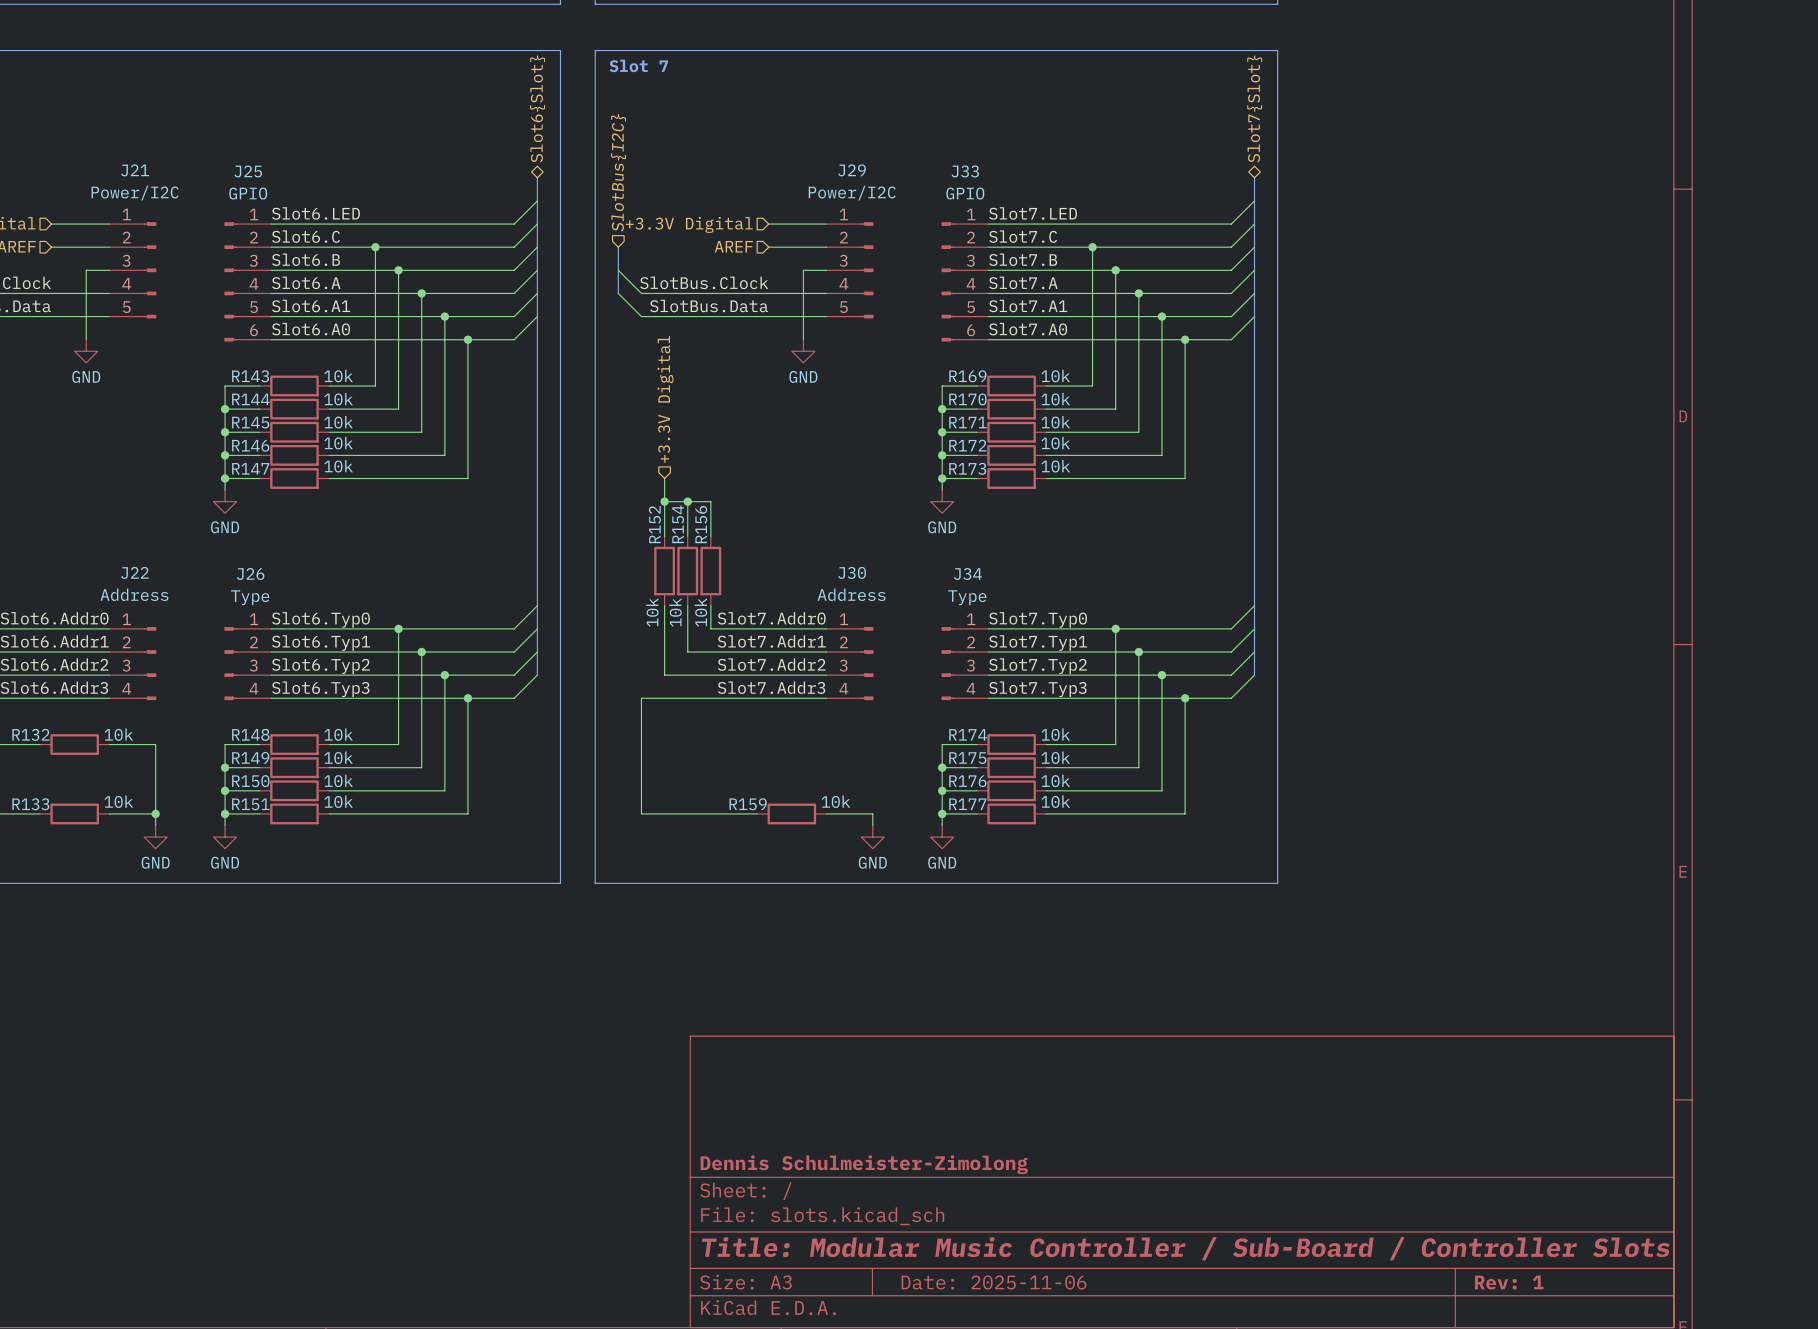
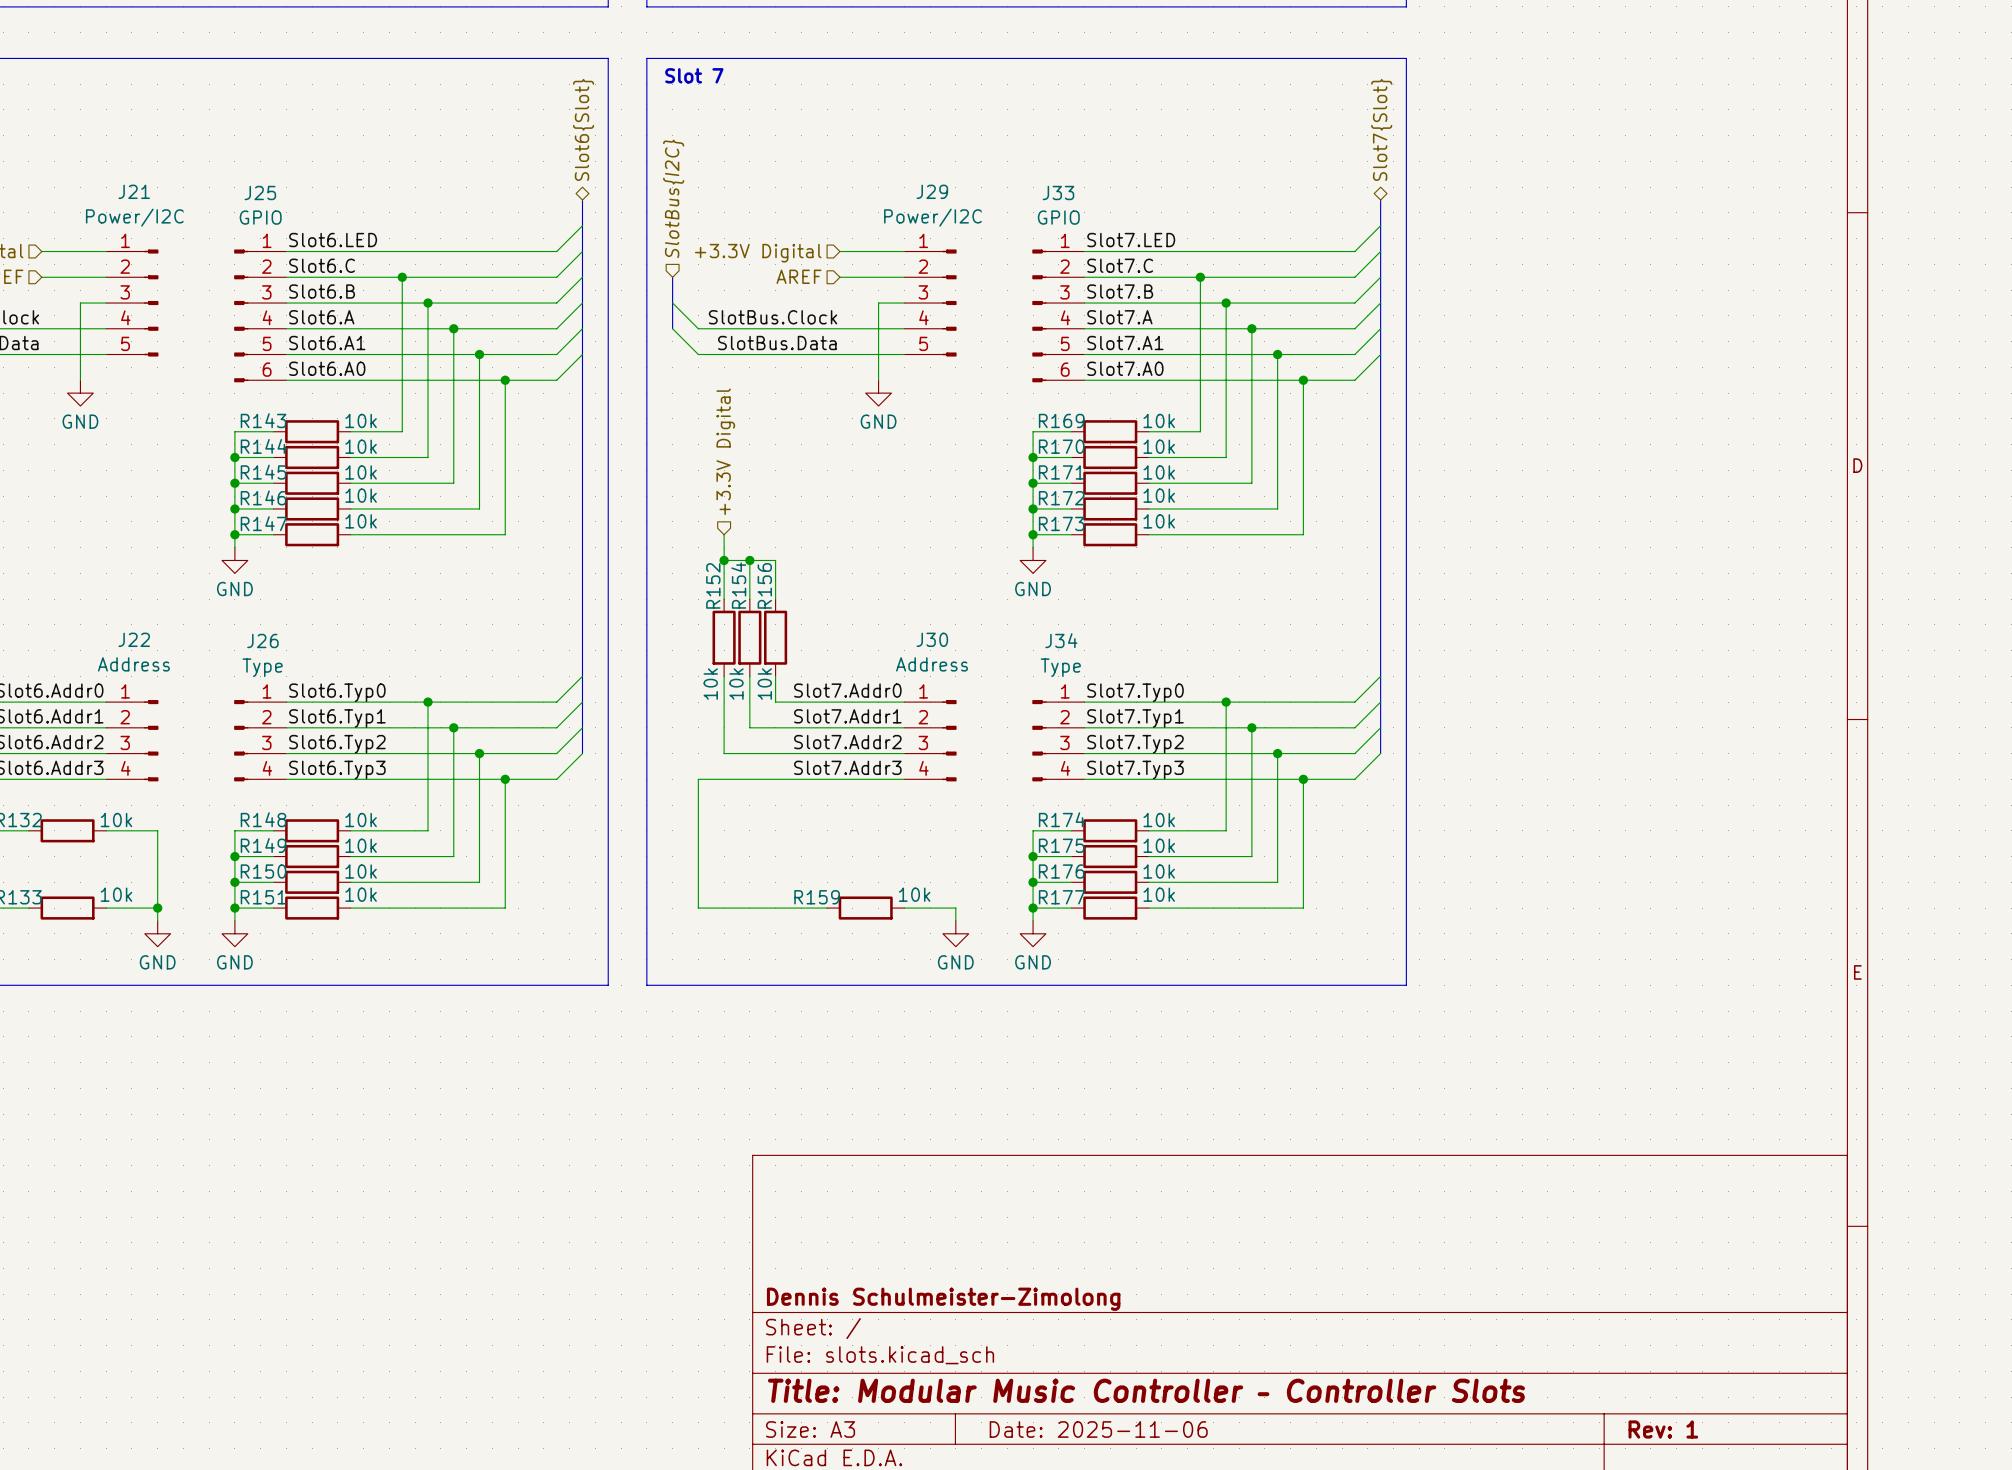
title block: Title: Modular Music Controller / Sub-Board / Controller Slots (1185, 1248) -> Title: Modular Music Controller – Controller Slots (1146, 1390)

